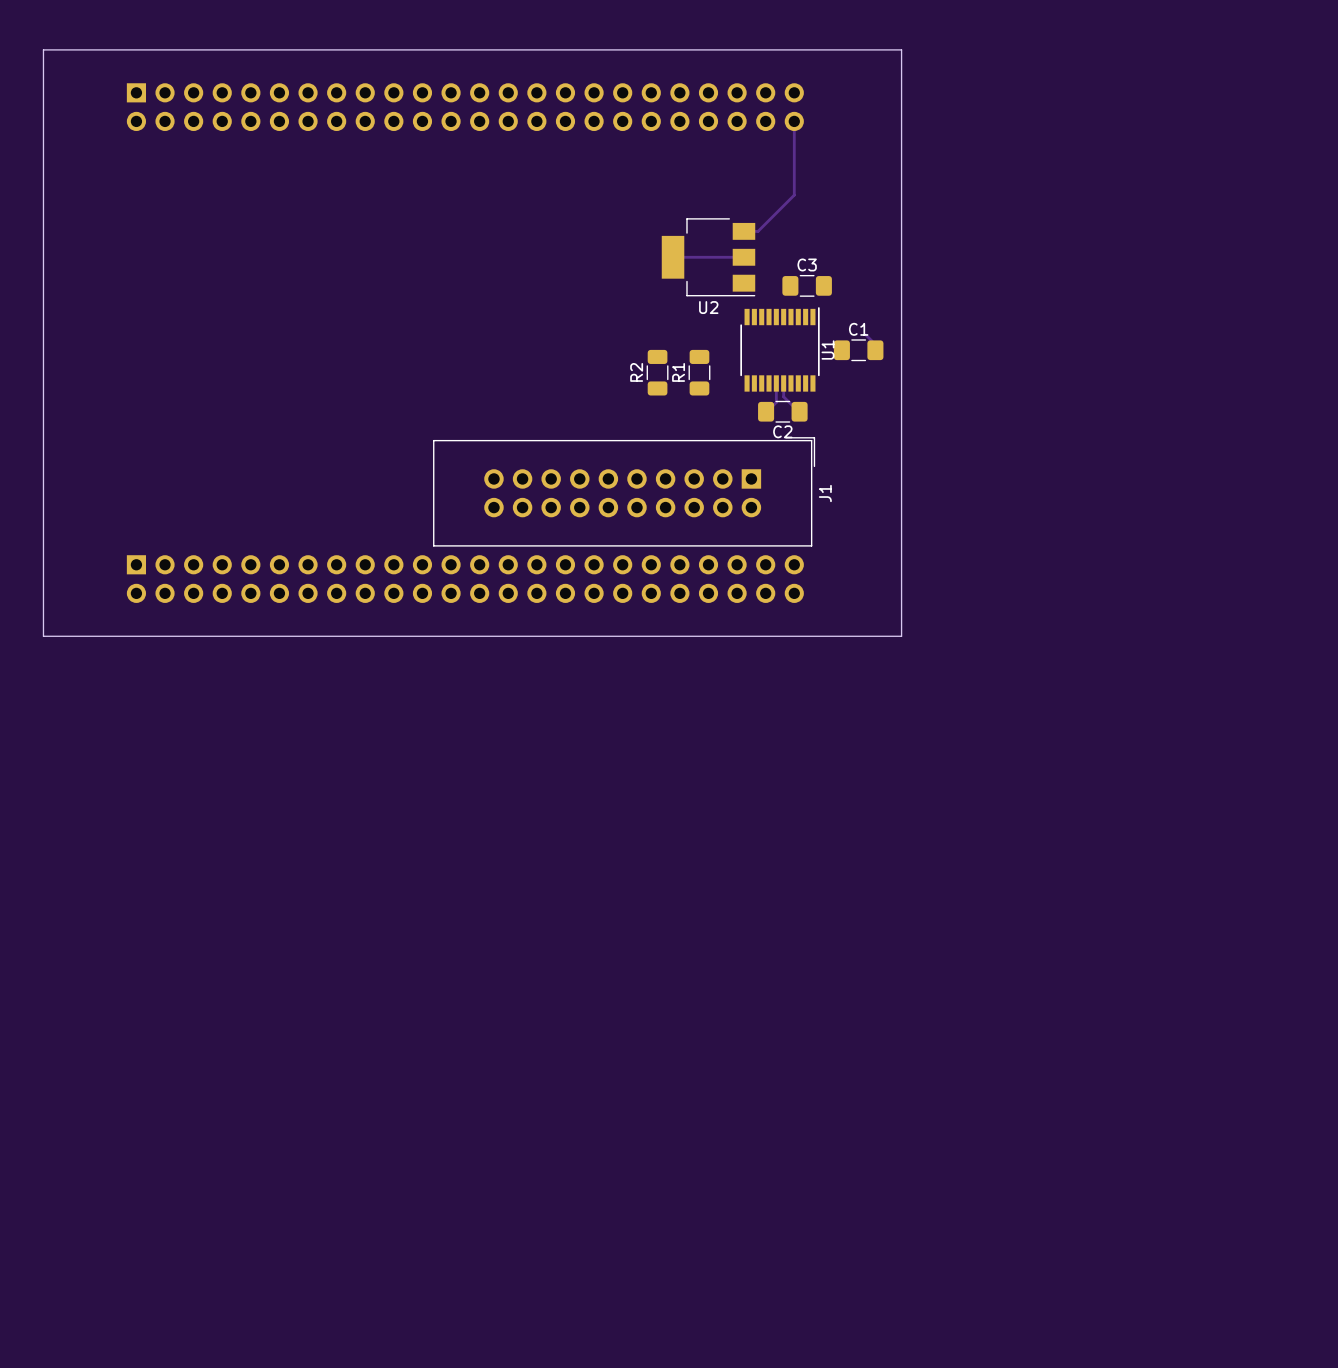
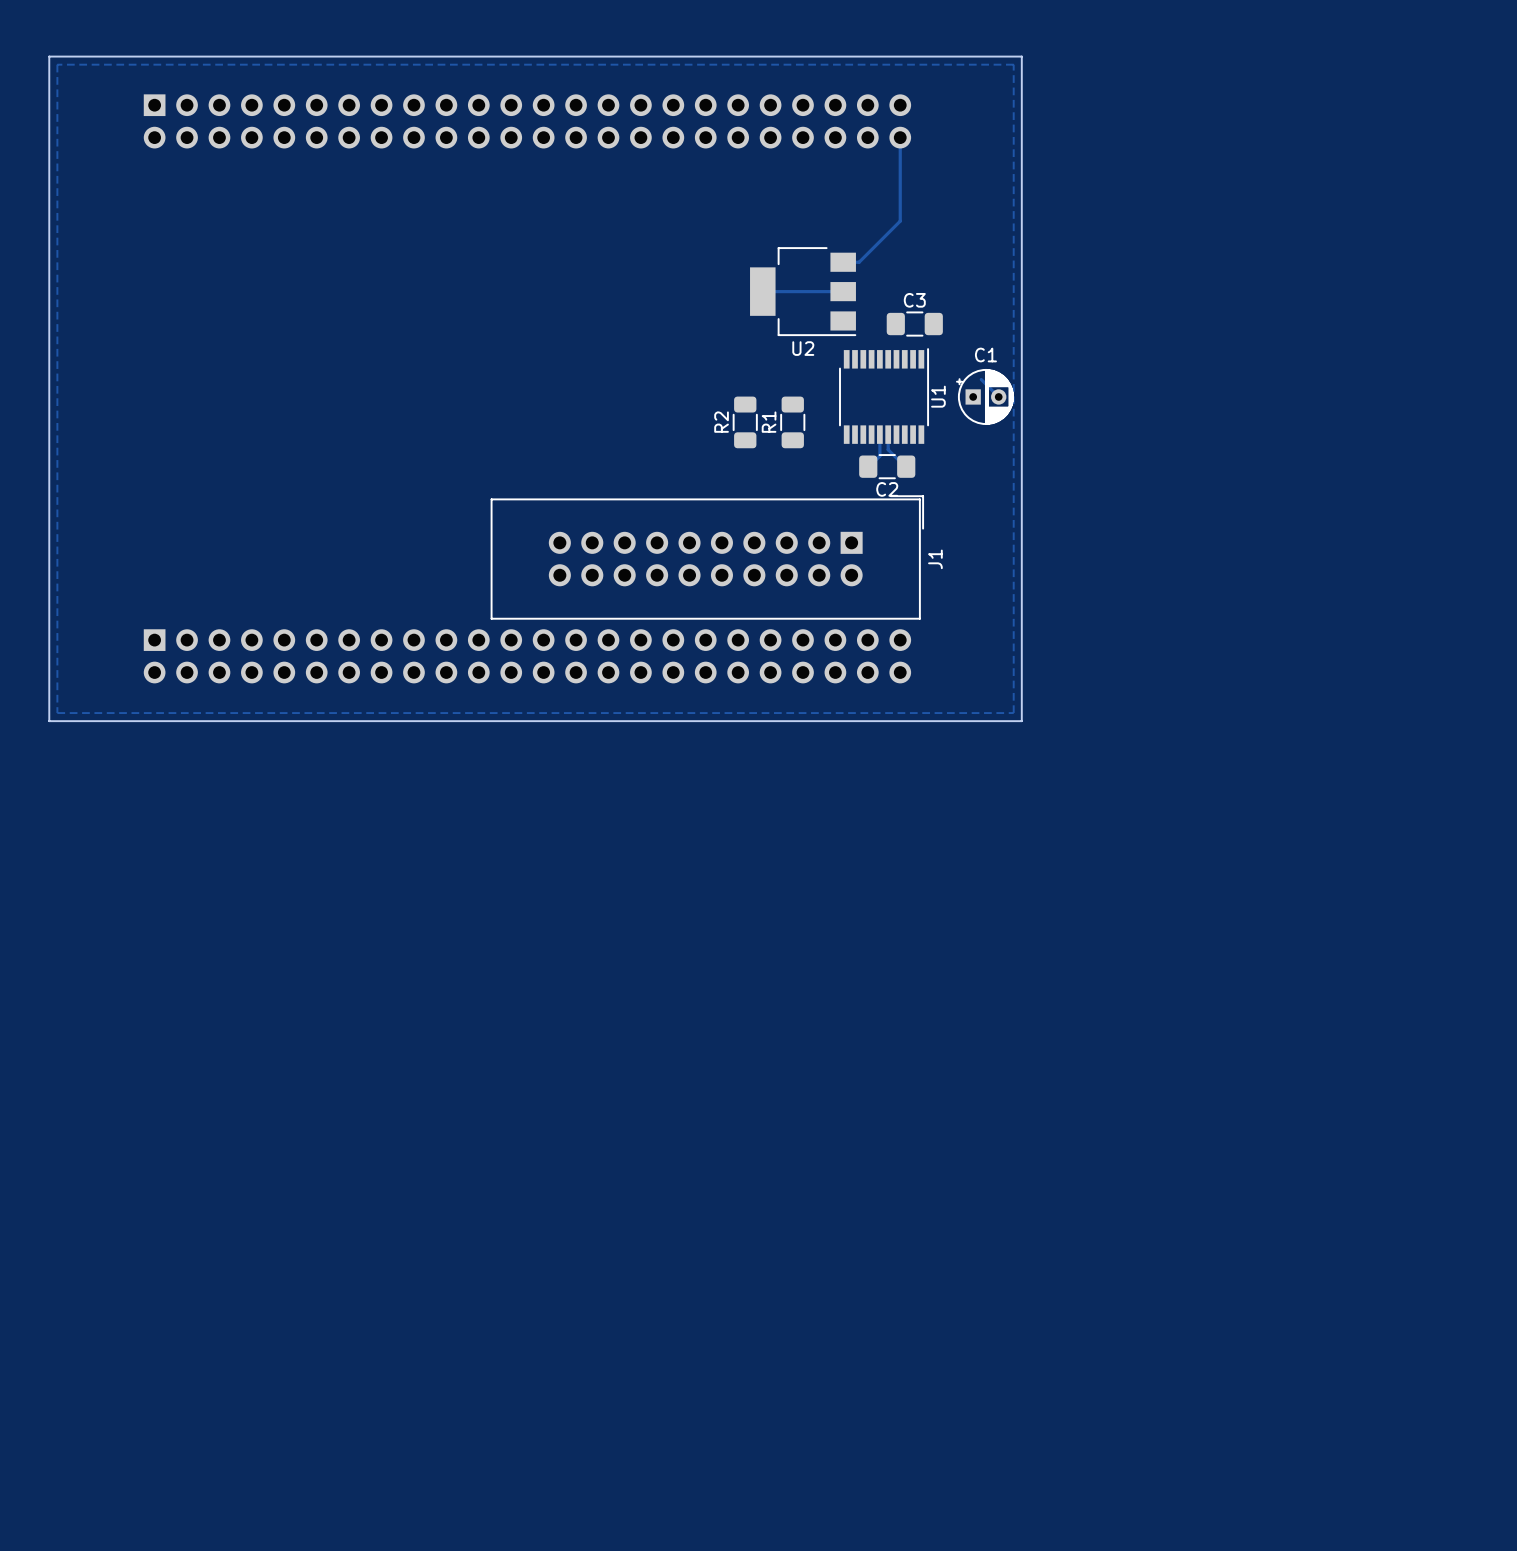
zone outline: none -> (57, 64) (1013, 64) (1013, 713) (57, 713) (57, 64)
C1 footprint: [833, 339, 884, 362] -> [956, 369, 1014, 425]

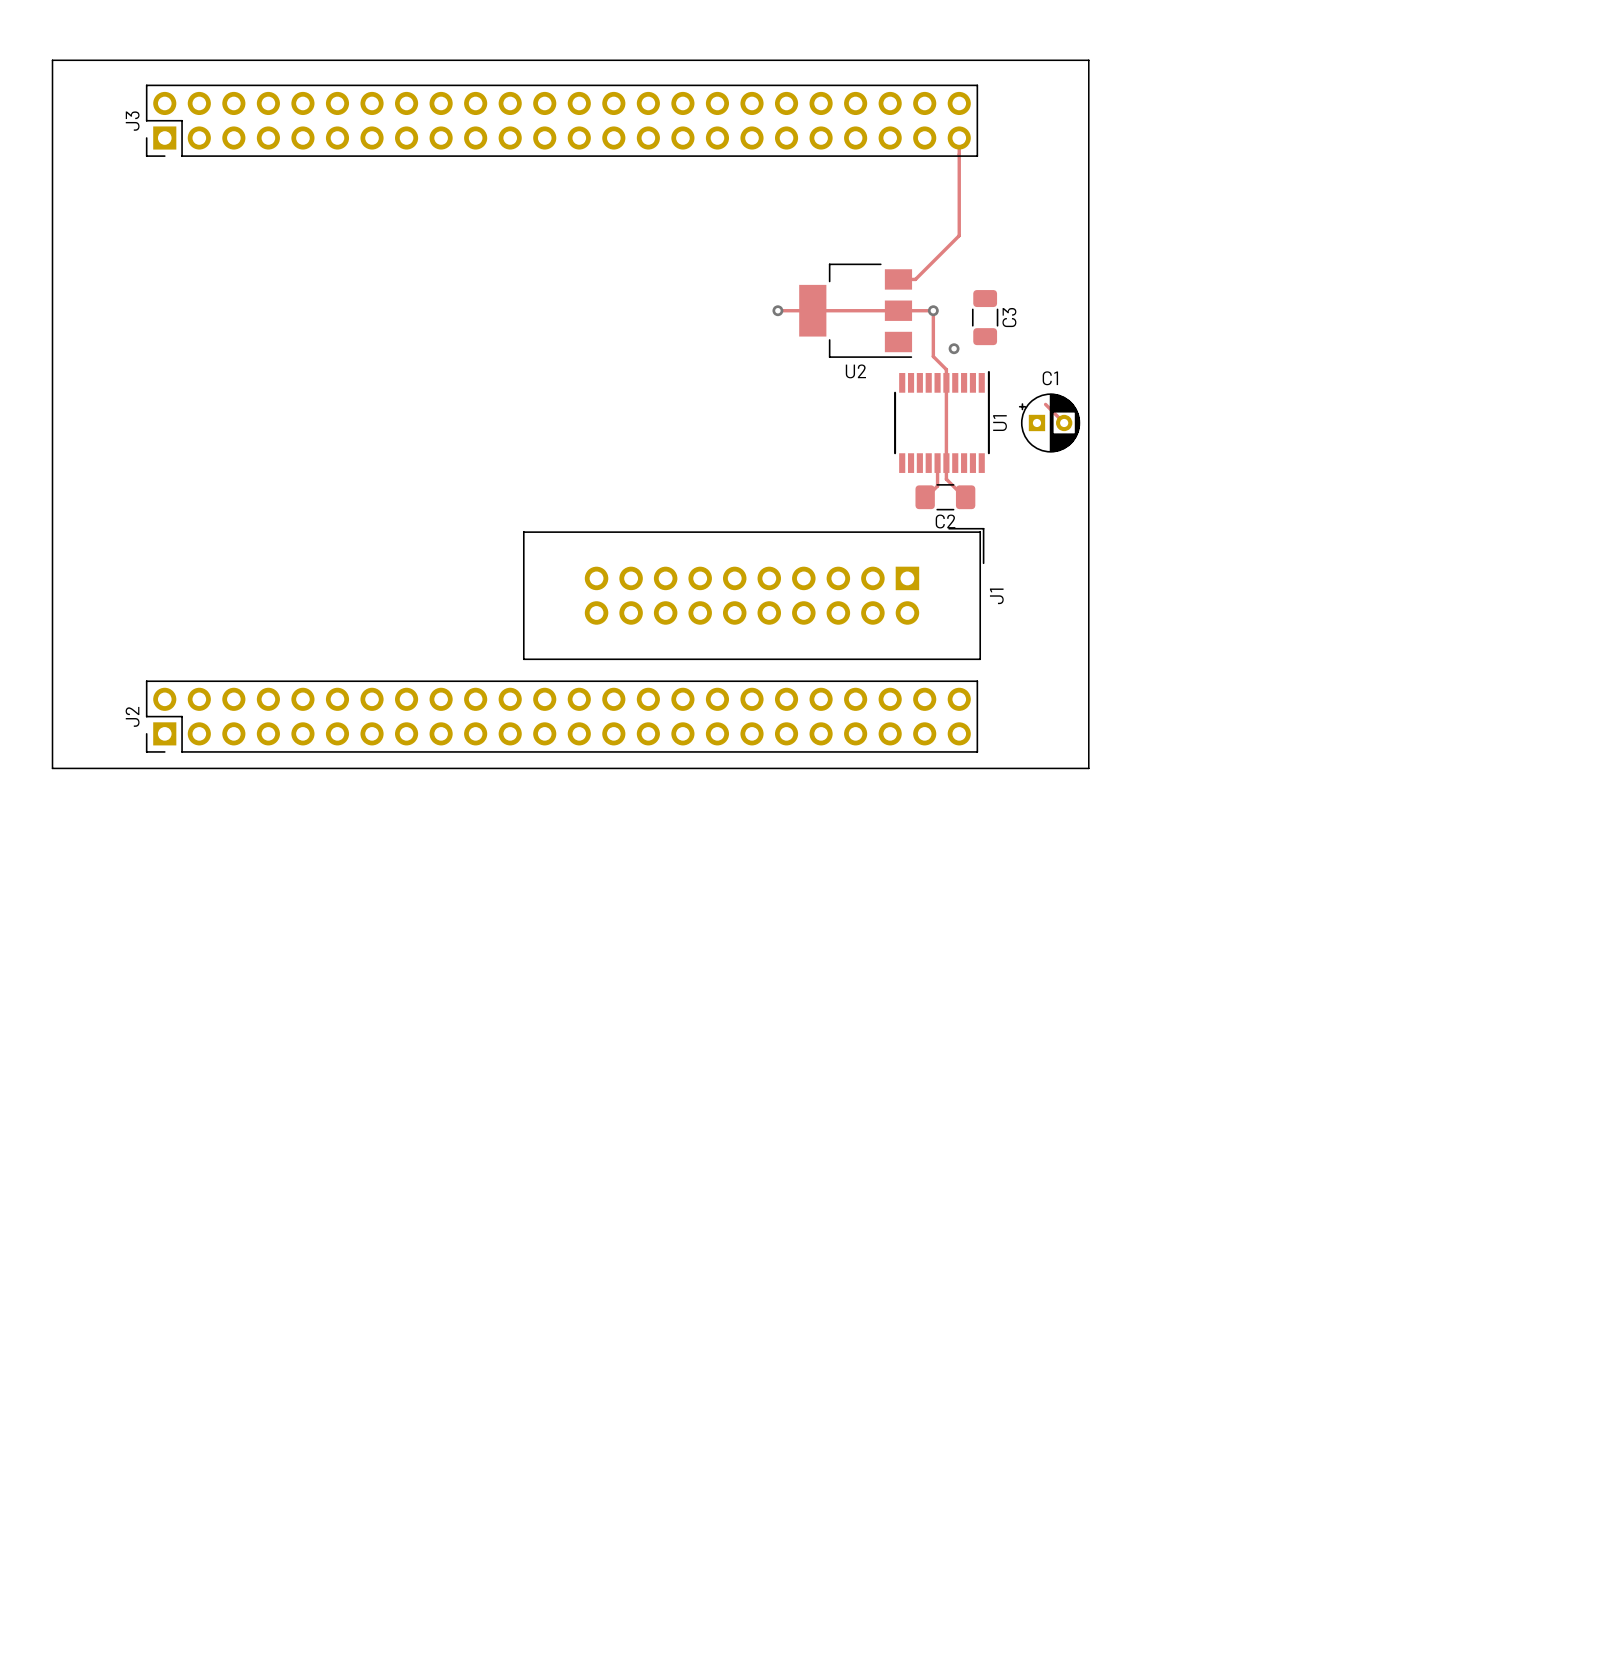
zone outline: (57, 64) (1013, 64) (1013, 713) (57, 713) (57, 64) -> none
J3 side: bottom (527, 121) -> top (562, 120)
track: none -> (777, 310) (812, 310)
via: none -> (777, 310)
track: none -> (898, 310) (933, 310) (933, 356) (946, 369) (946, 463)
via: none -> (933, 310)
C3 name position: C3 (914, 300) -> C3 (1009, 317)
C3 footprint: [886, 311, 943, 337] -> [971, 290, 999, 346]
via: none -> (954, 348)
R2: (745, 422) -> none
R1: (792, 422) -> none
J2 side: bottom (527, 656) -> top (562, 716)

